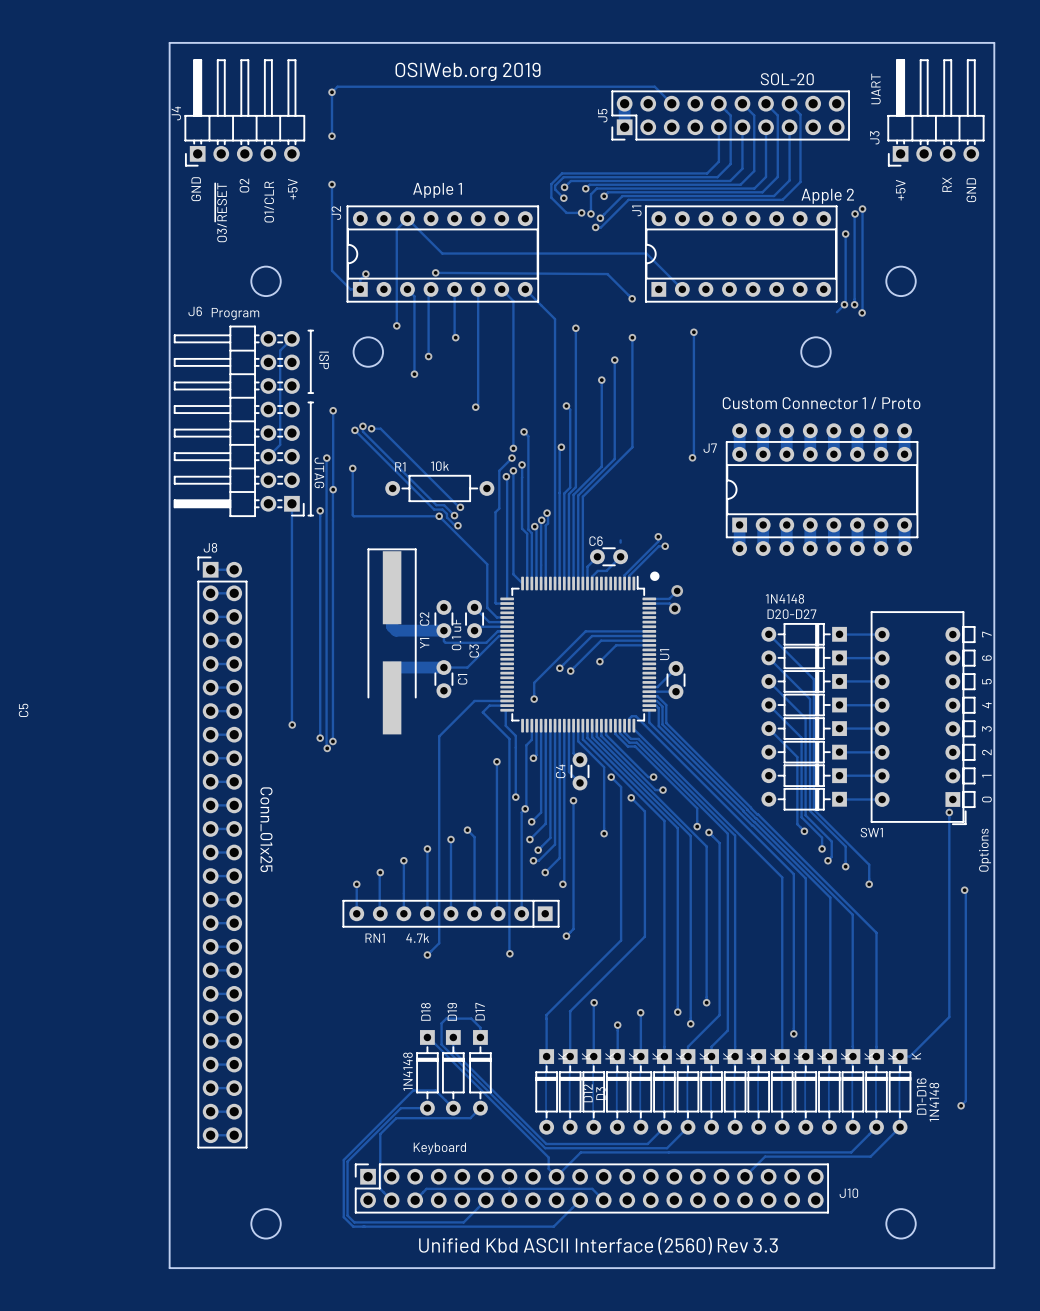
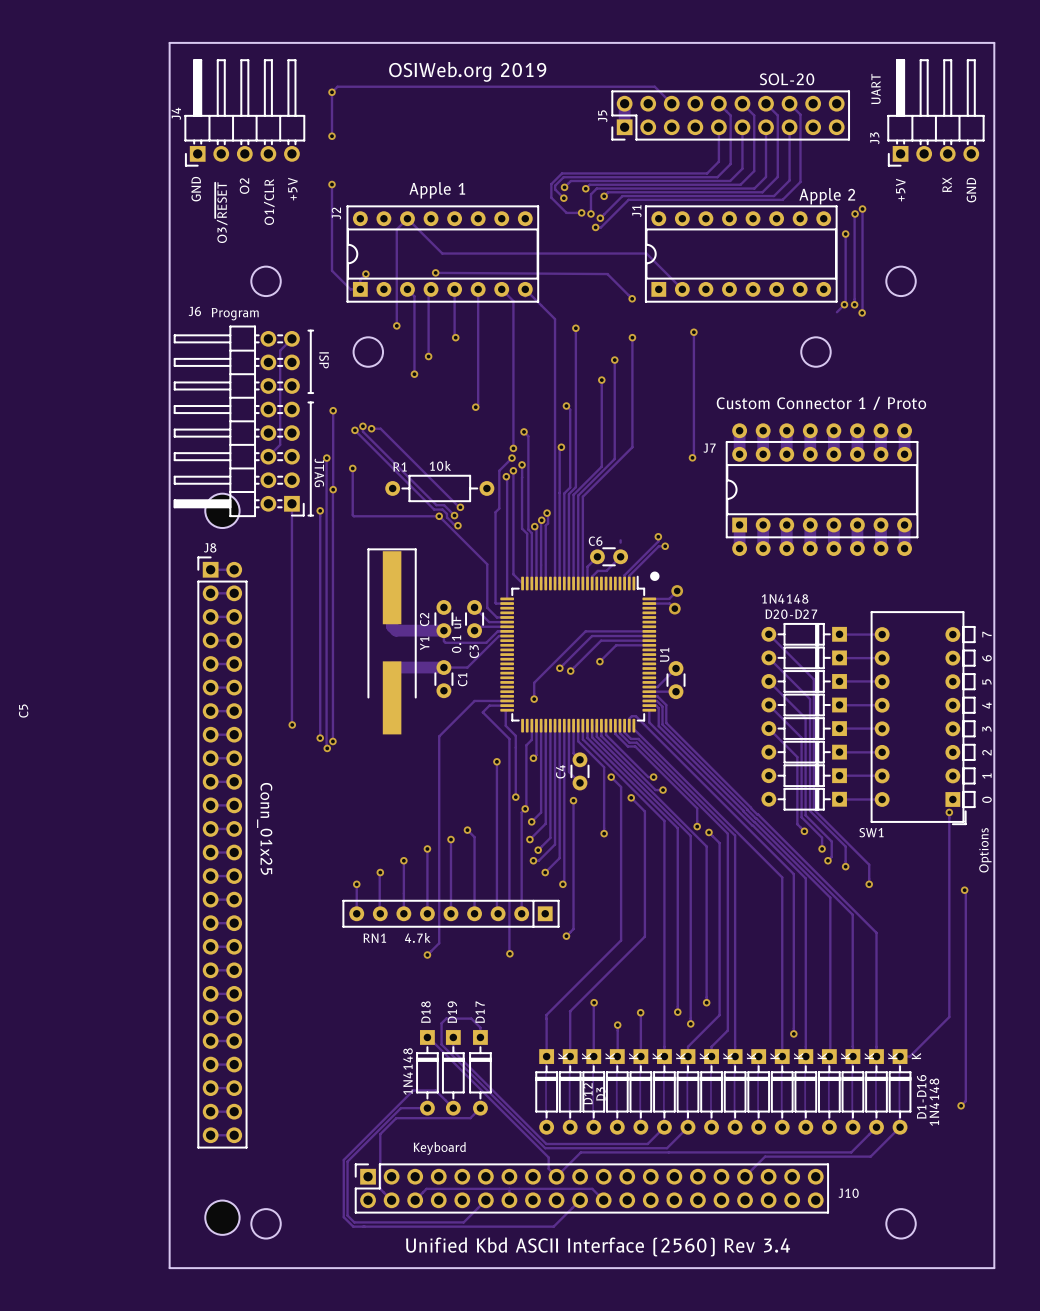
part: none -> (222, 510)
part: none -> (222, 1217)
text: Unified Kbd ASCII Interface (2560) Rev 3.3 (598, 1245) -> Unified Kbd ASCII Interface (2560) Rev 3.4 (598, 1246)

